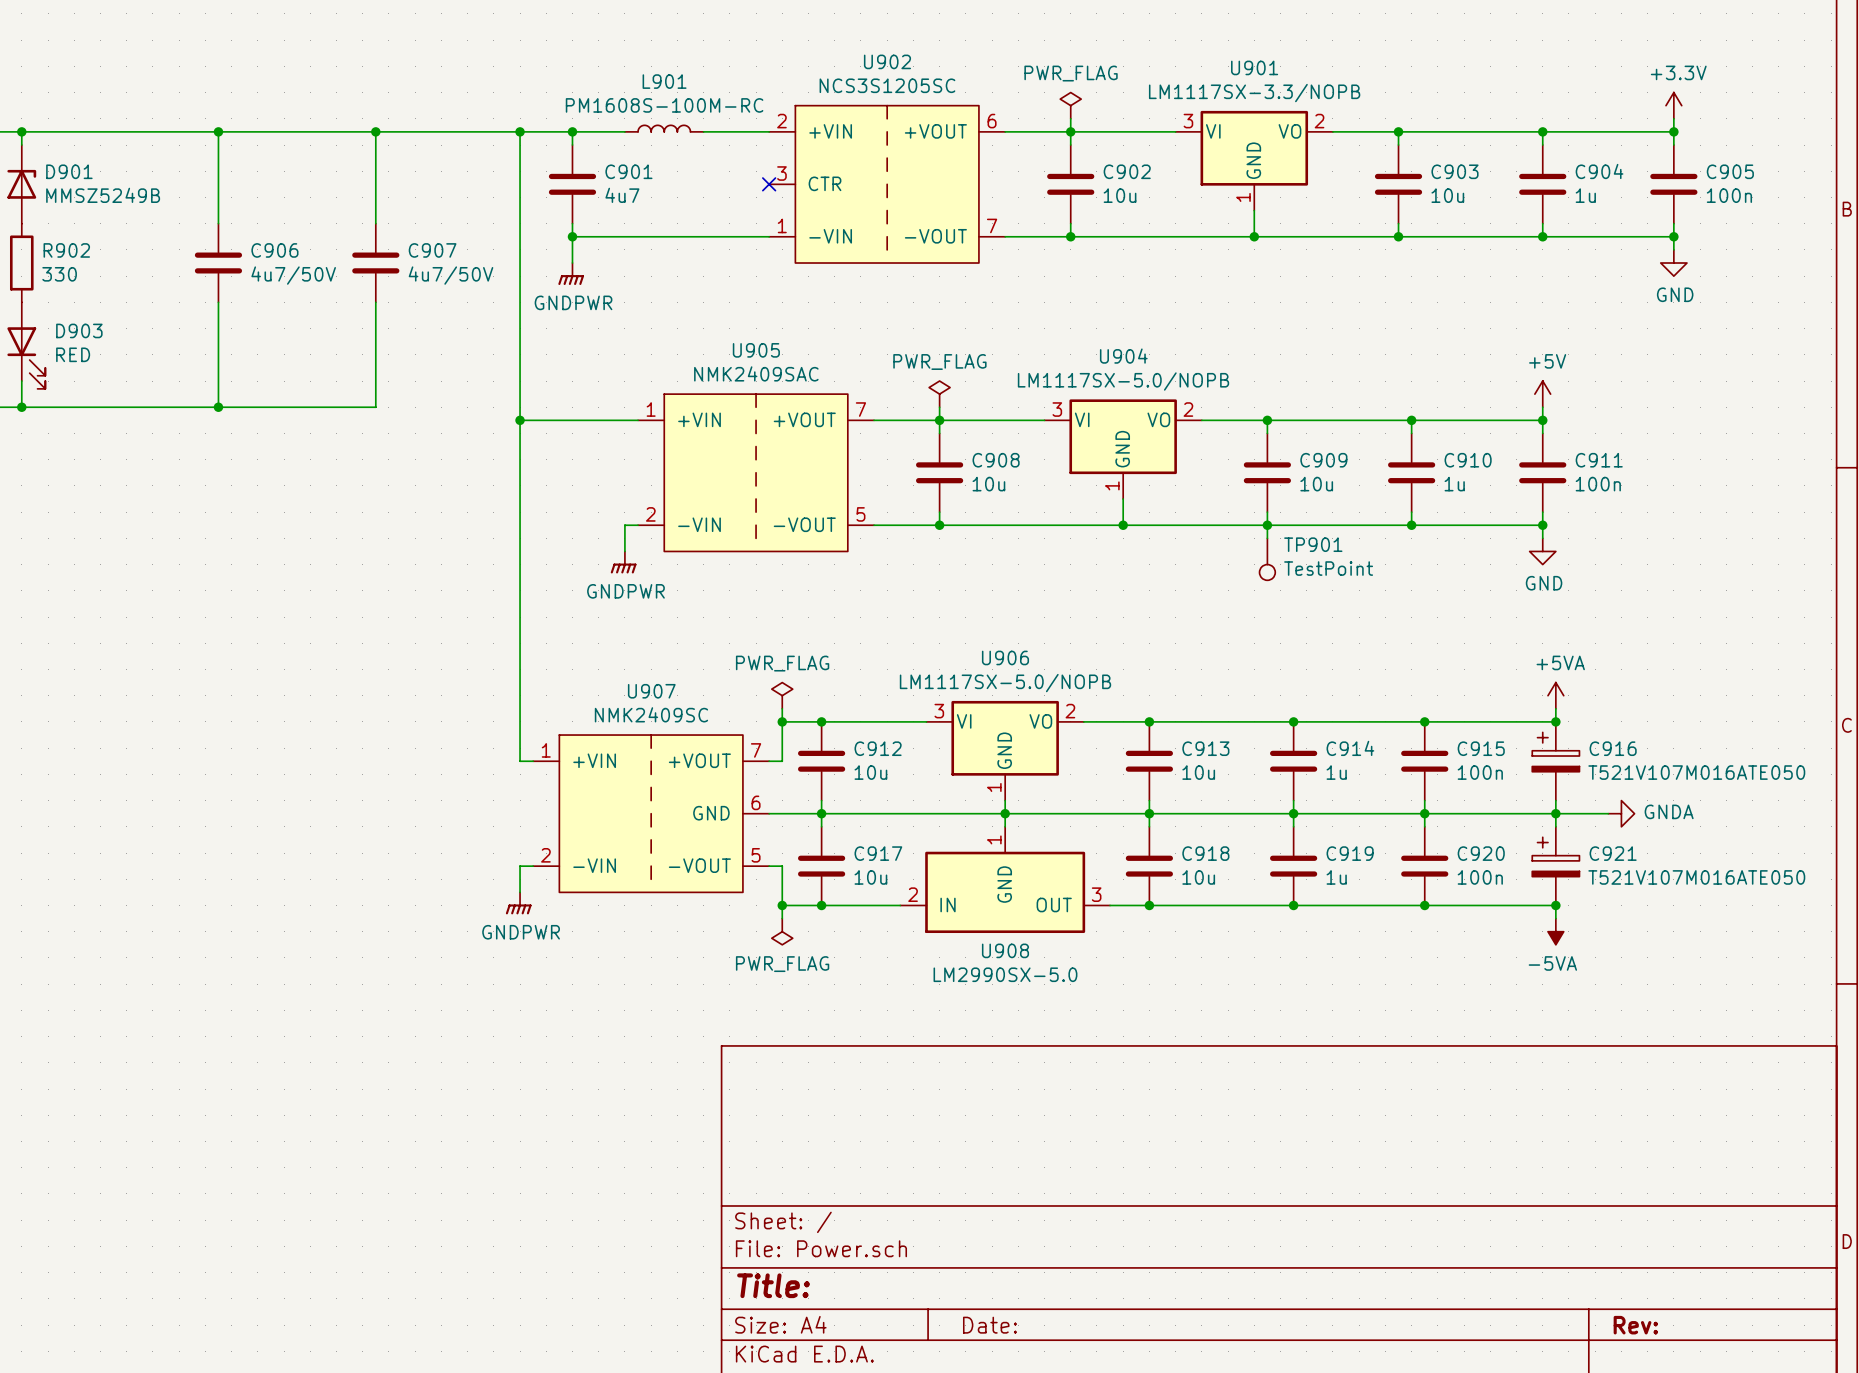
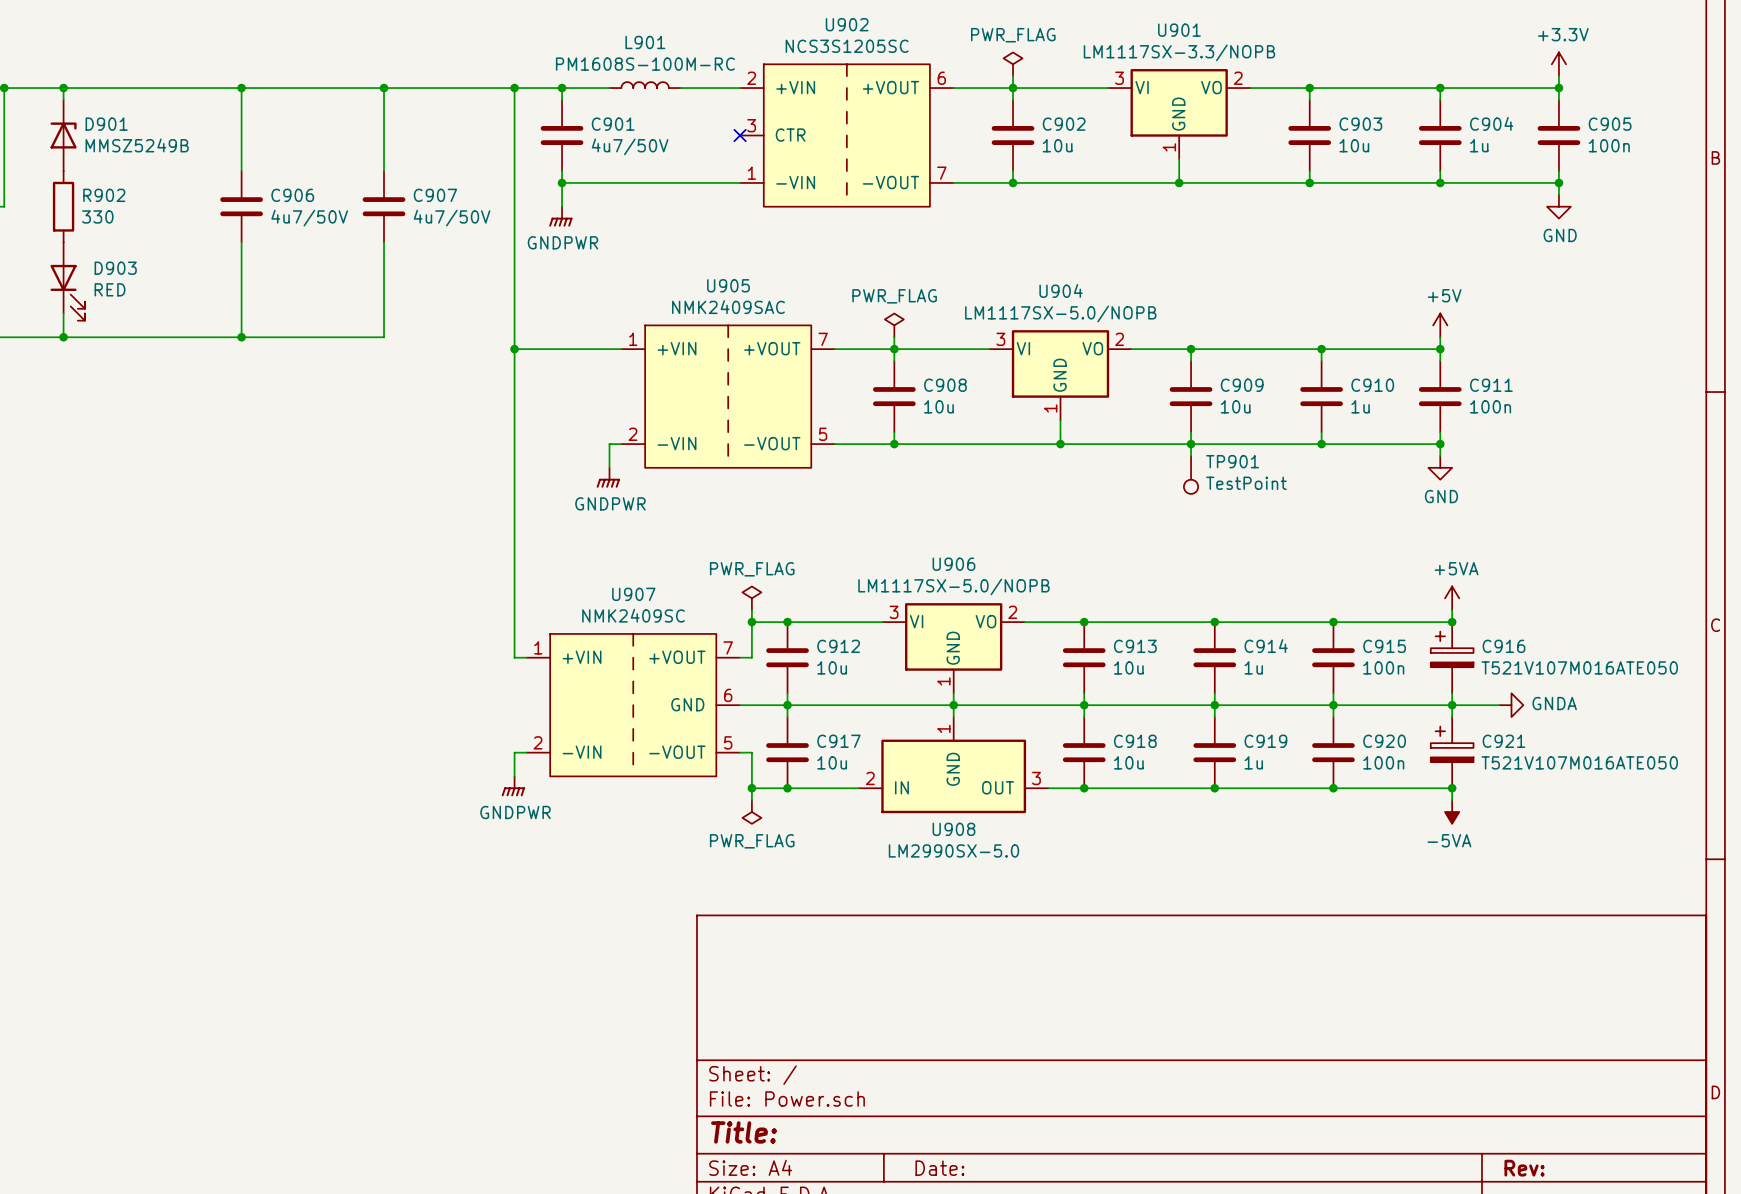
C901 value: 4u7 (622, 195) -> 4u7/50V (630, 146)

